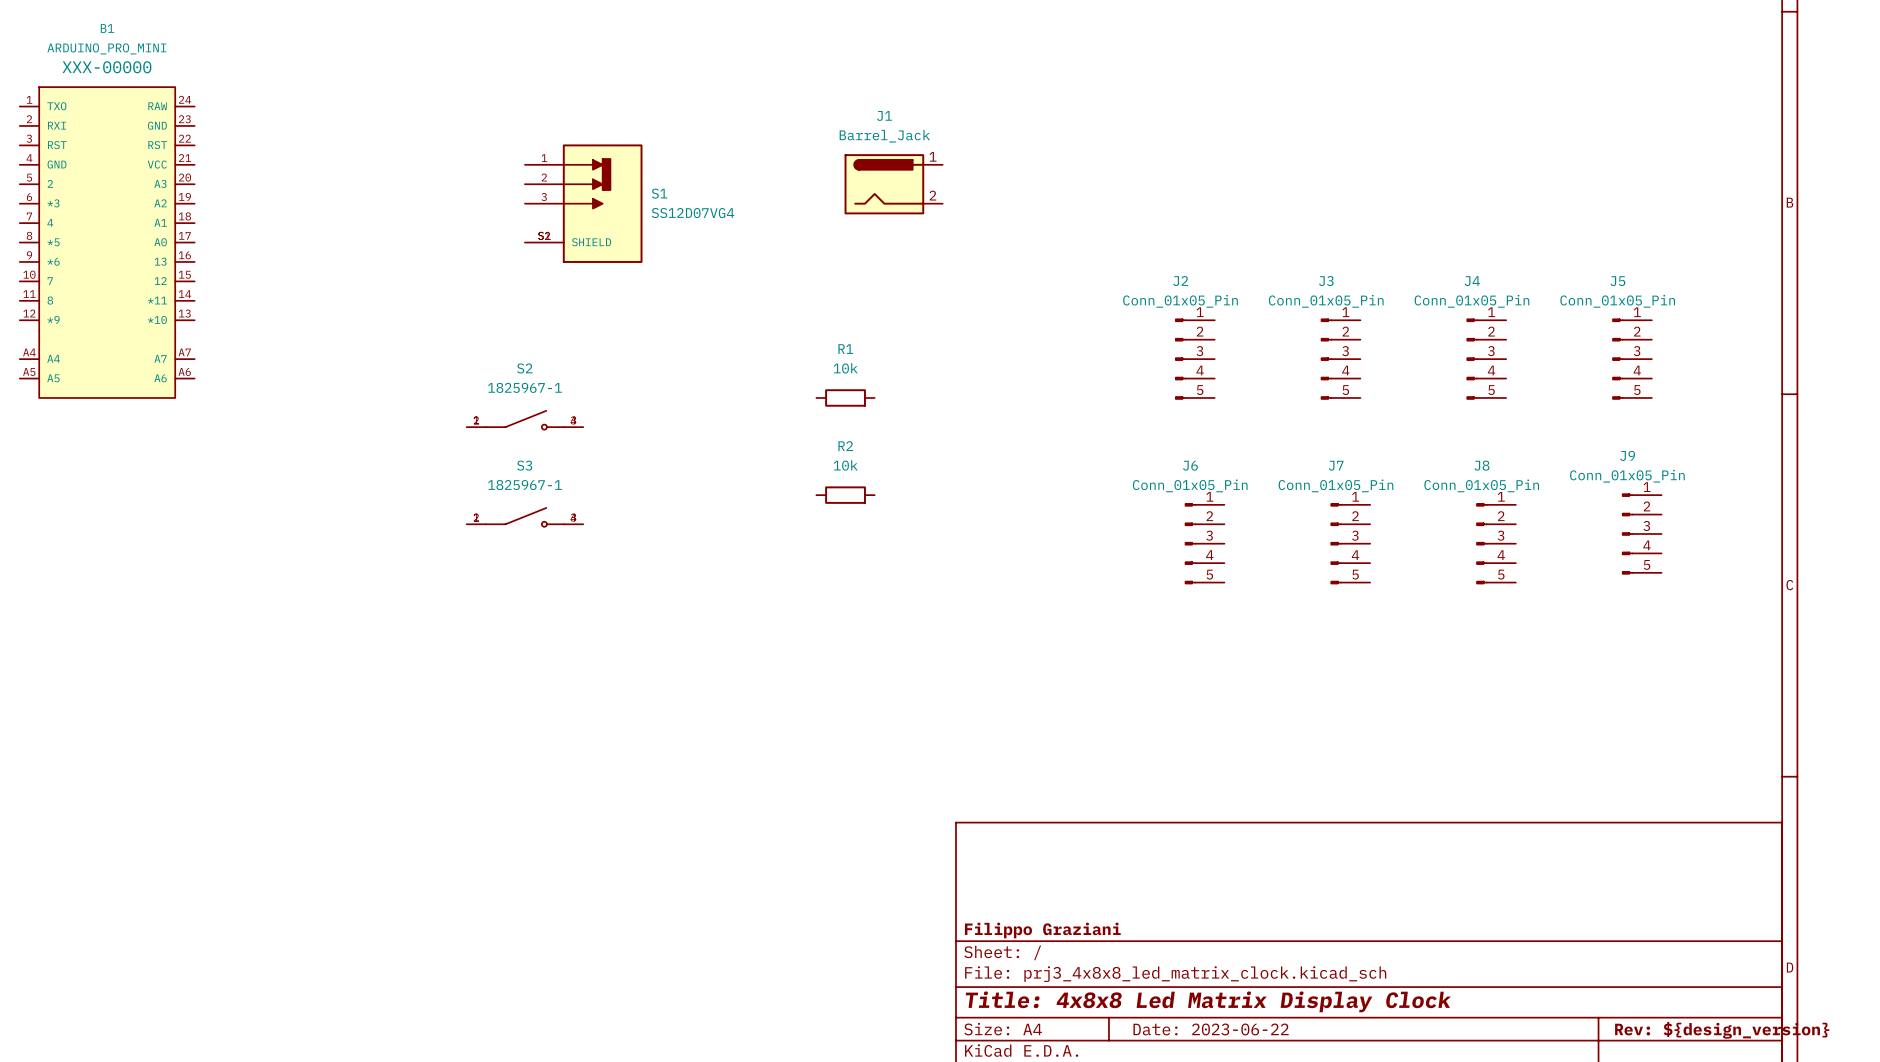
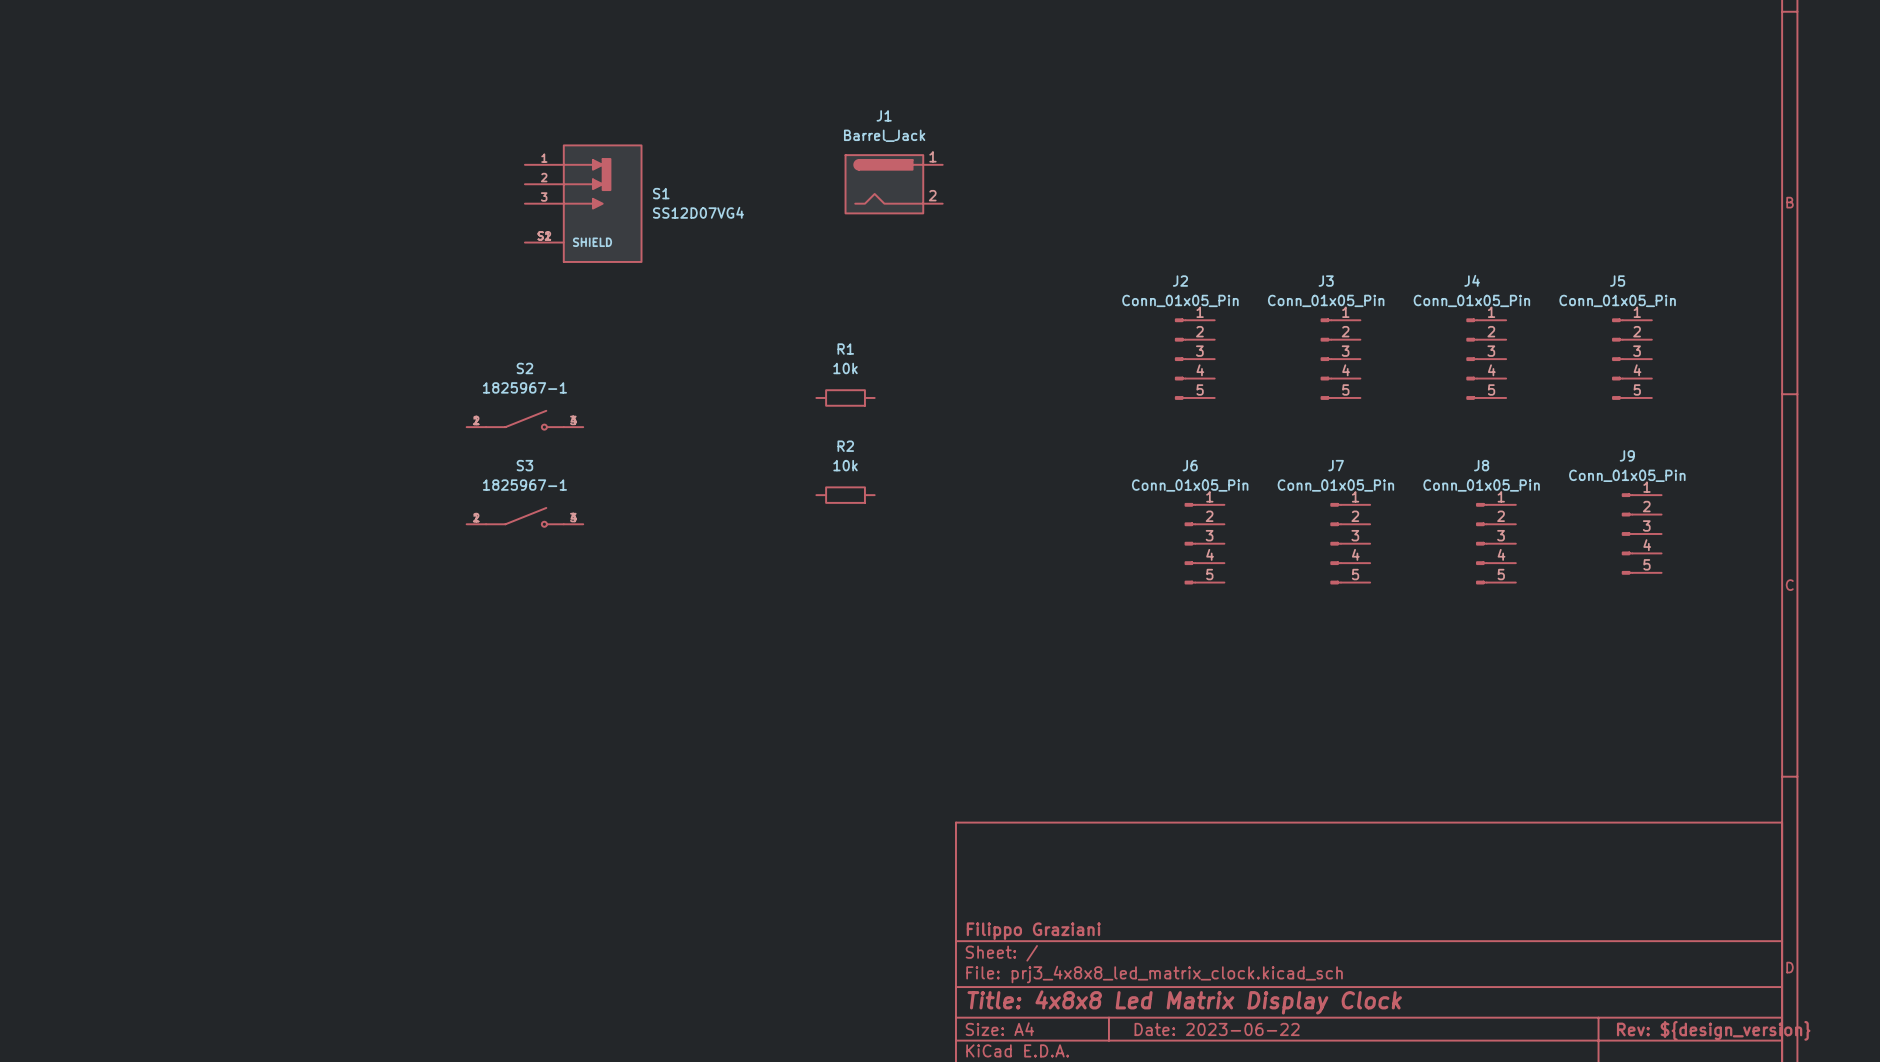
B1: ARDUINO_PRO_MINI (107, 242) -> none

